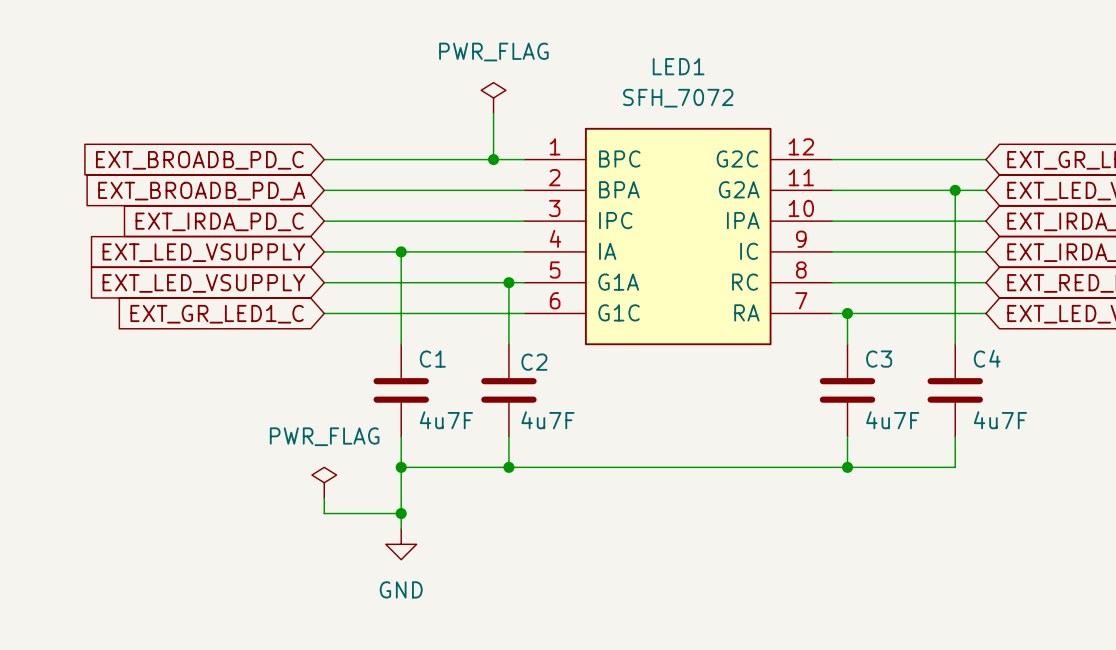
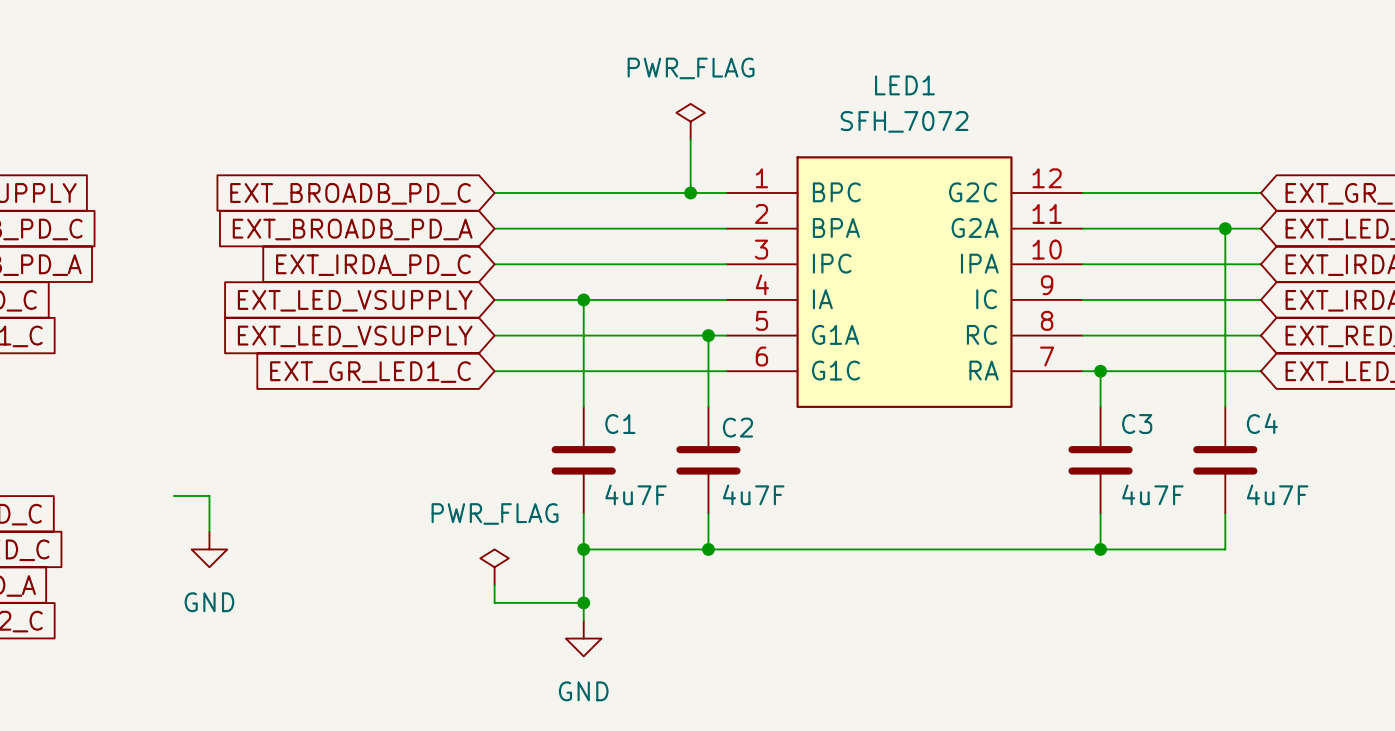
wire: none -> (173, 495) (209, 495) (209, 531)
power symbol: none -> GND (209, 549)

